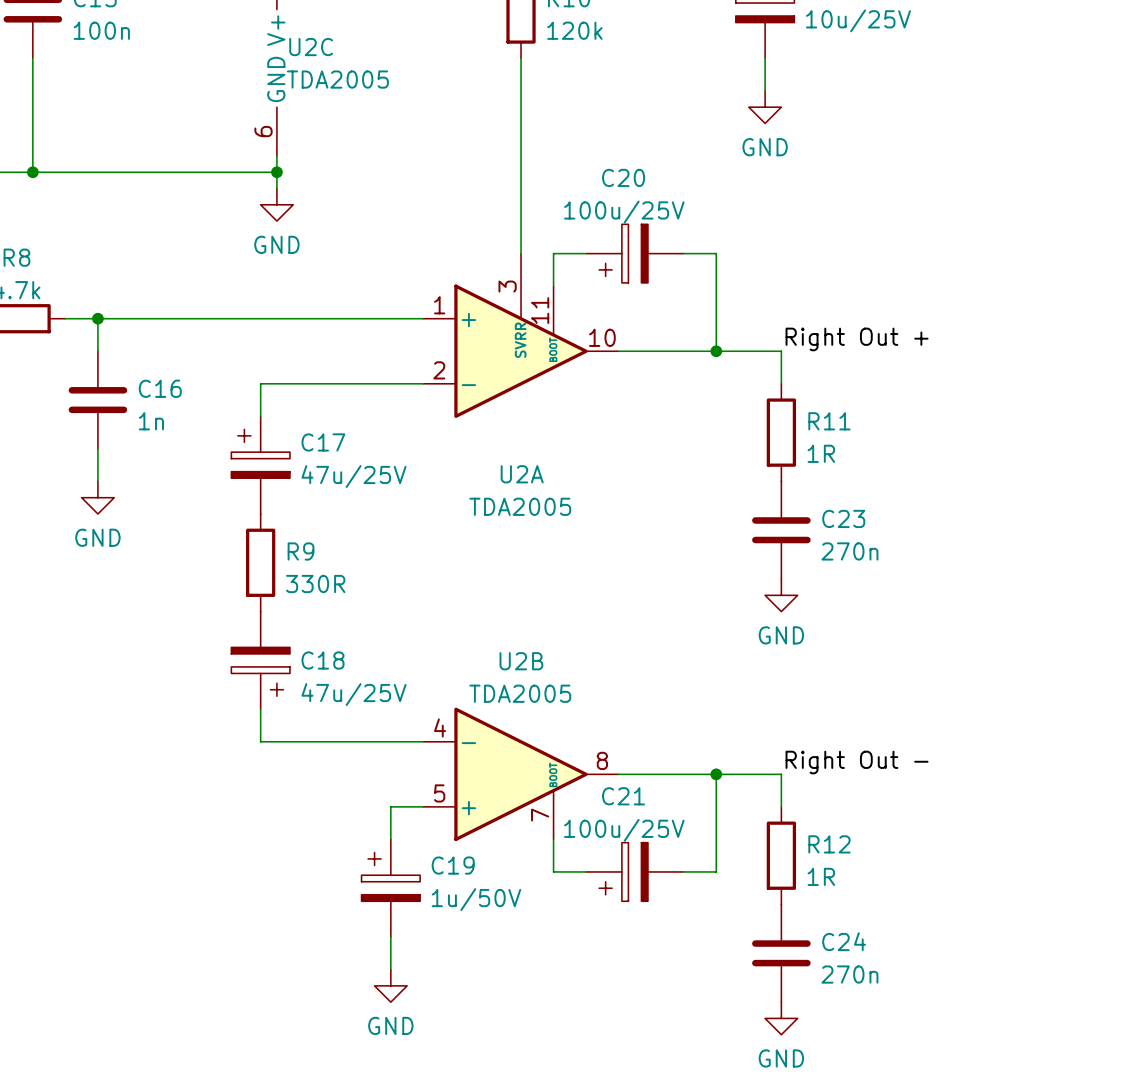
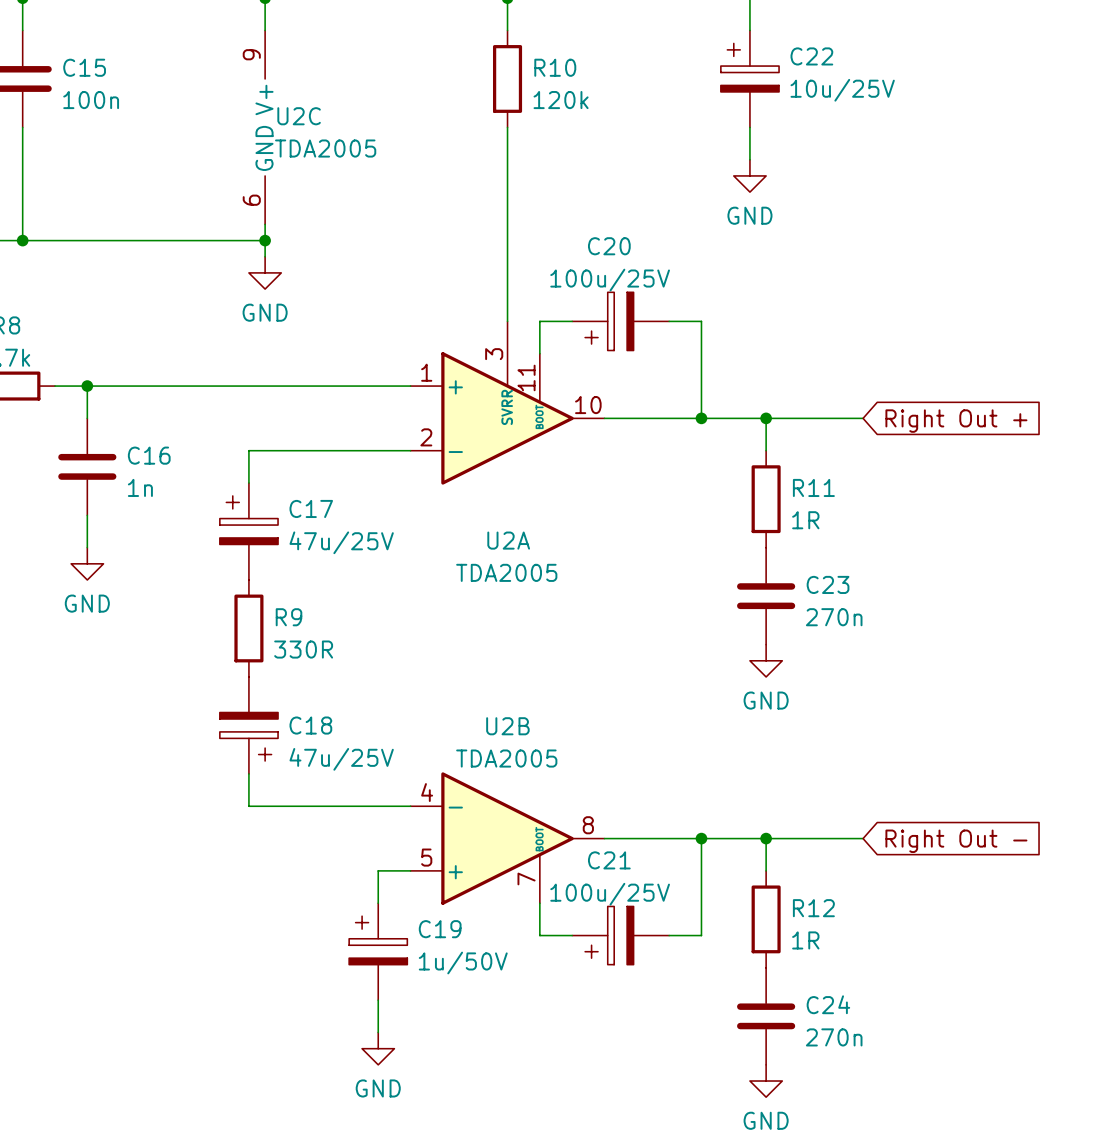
label: Right Out + (857, 339) -> none
wire: none -> (766, 418) (863, 418)
junction: none -> (766, 418)
global label: none -> Right Out + (956, 421)
label: Right Out - (857, 762) -> none
wire: none -> (766, 838) (863, 838)
junction: none -> (766, 838)
global label: none -> Right Out - (956, 841)

